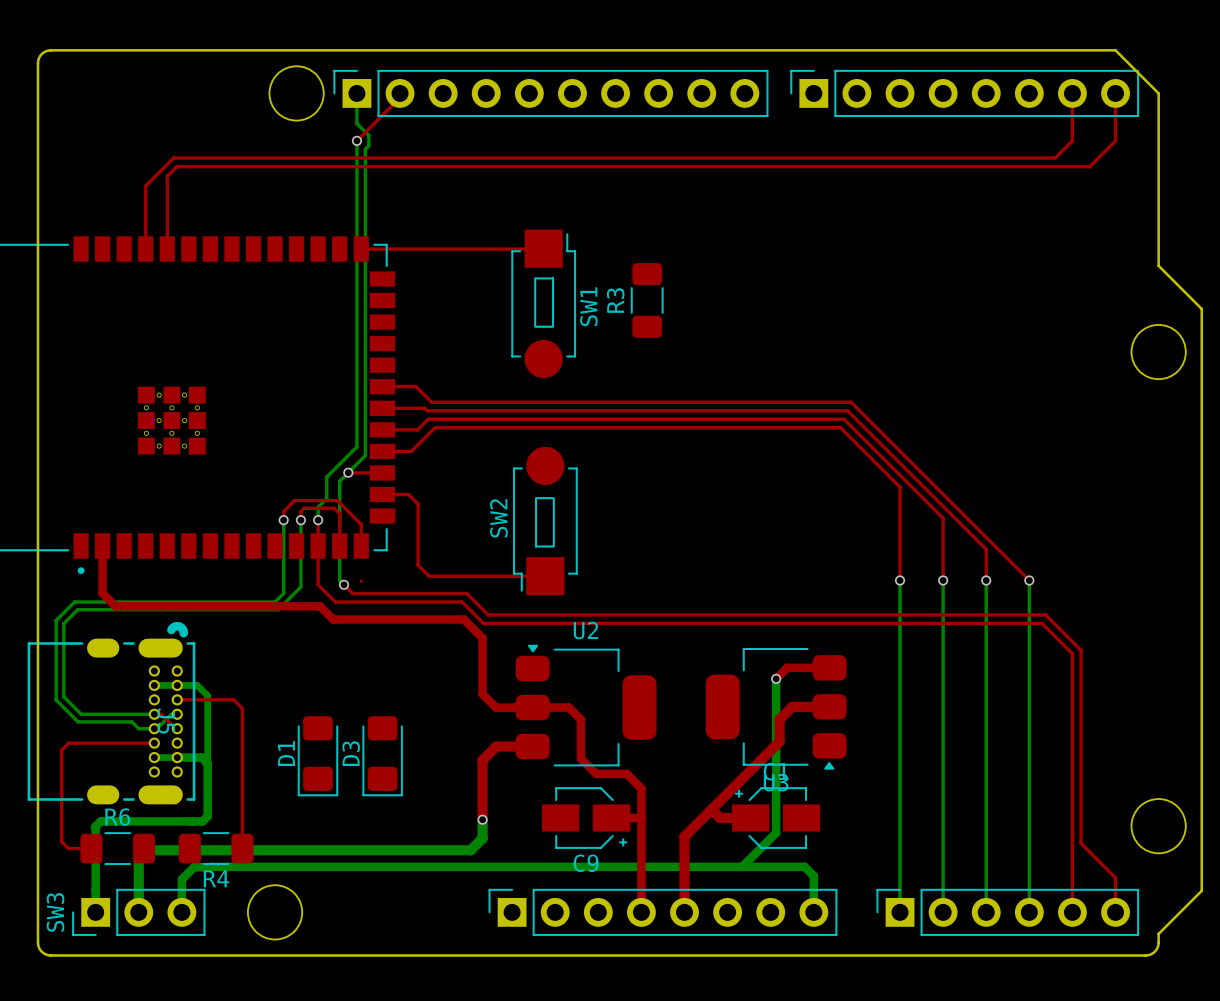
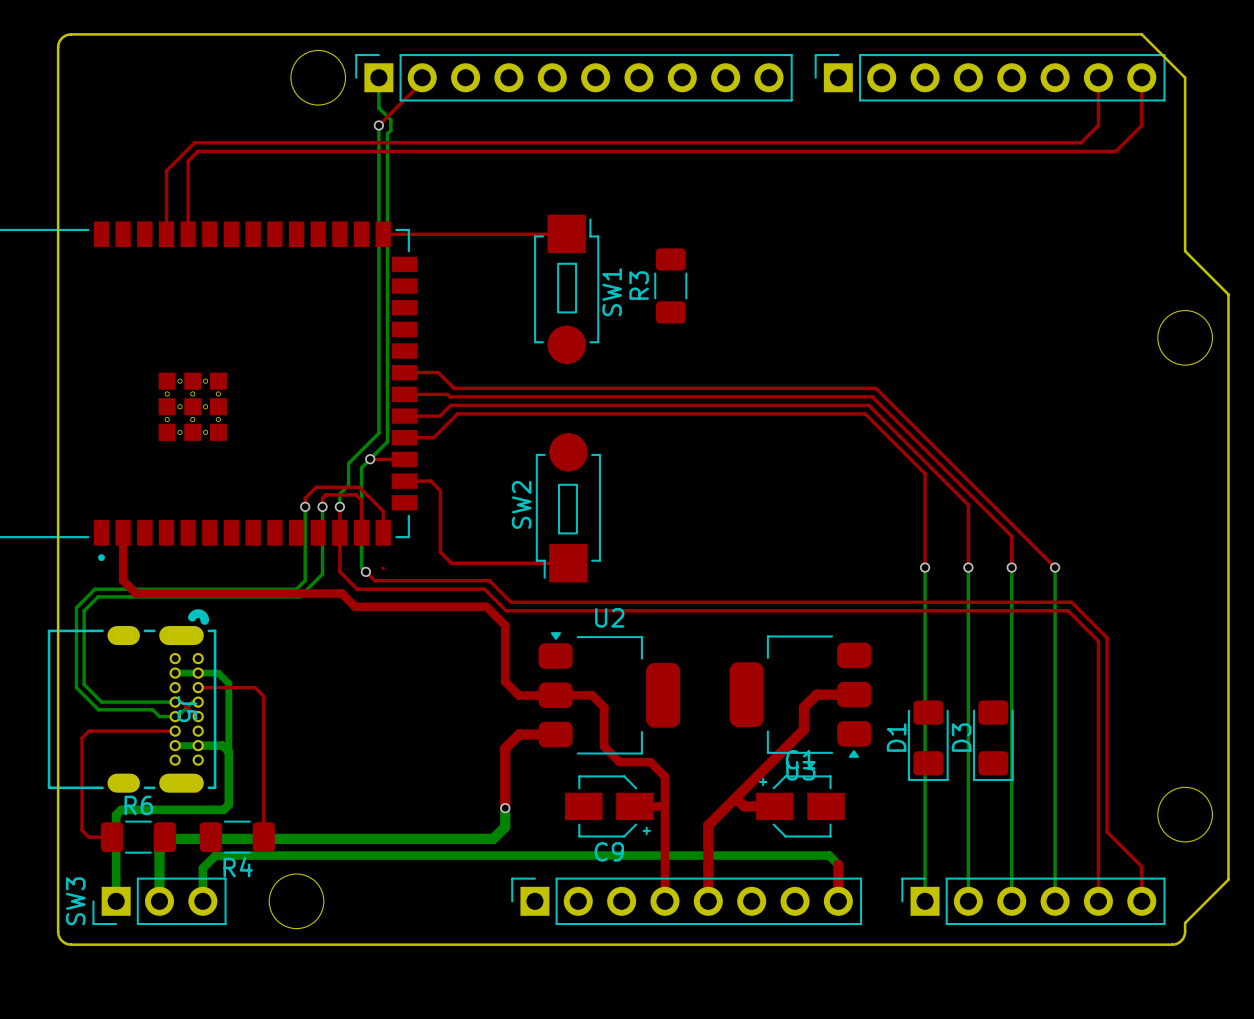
top track: (829, 667) (787, 667) (776, 678) -> none
bottom track: (776, 678) (776, 832) (742, 866) -> none
via: (776, 678) -> none
D1 position: (317, 756) -> (928, 740)
D3 position: (382, 756) -> (993, 740)
top track: none -> (838, 864) (838, 901)

